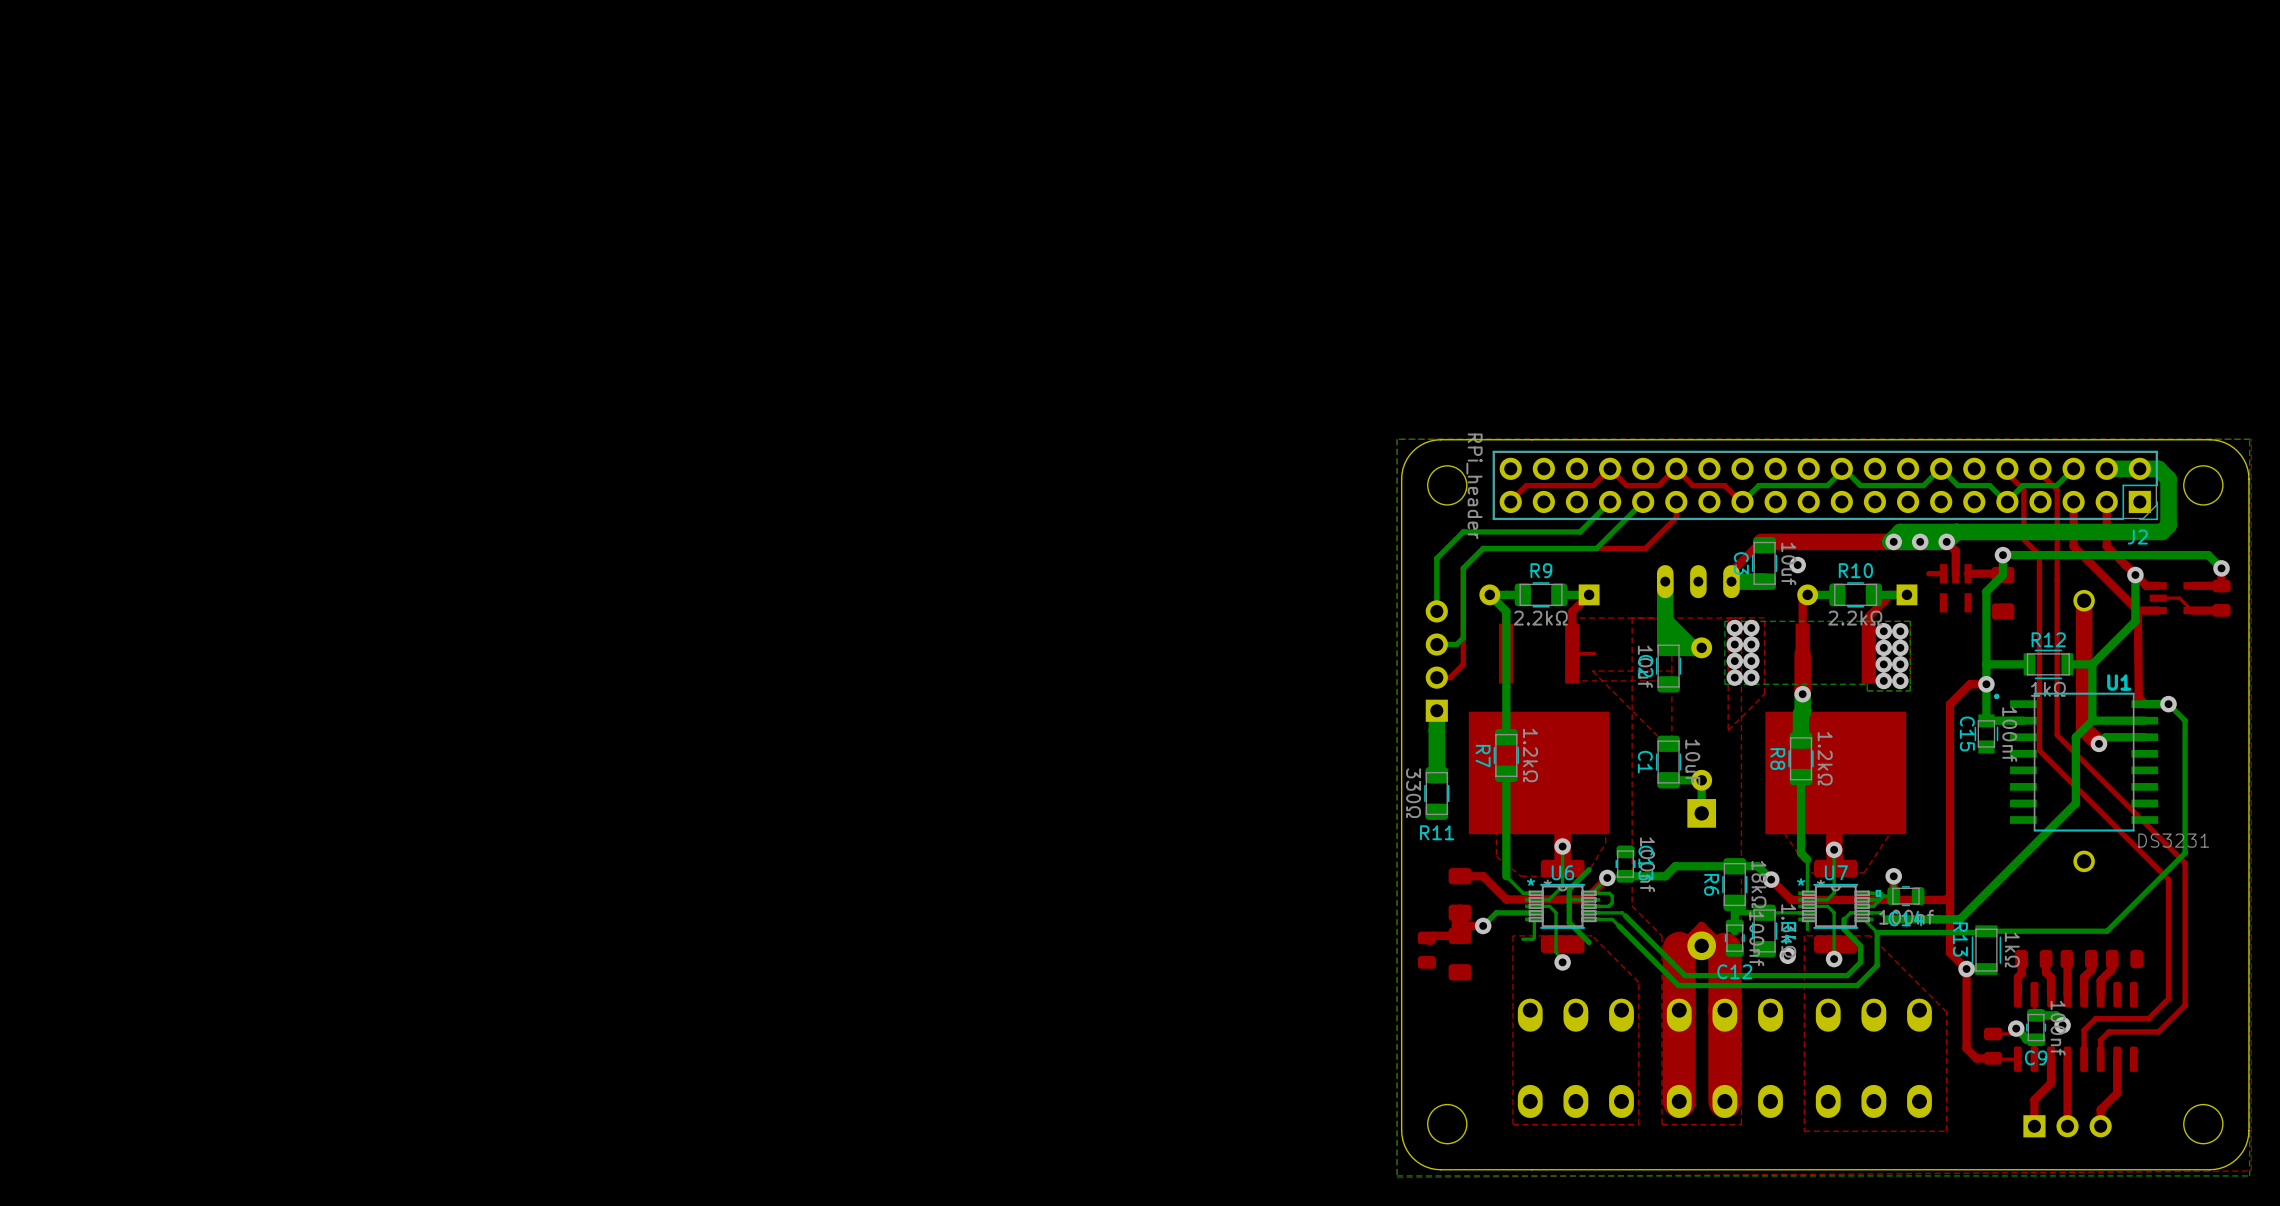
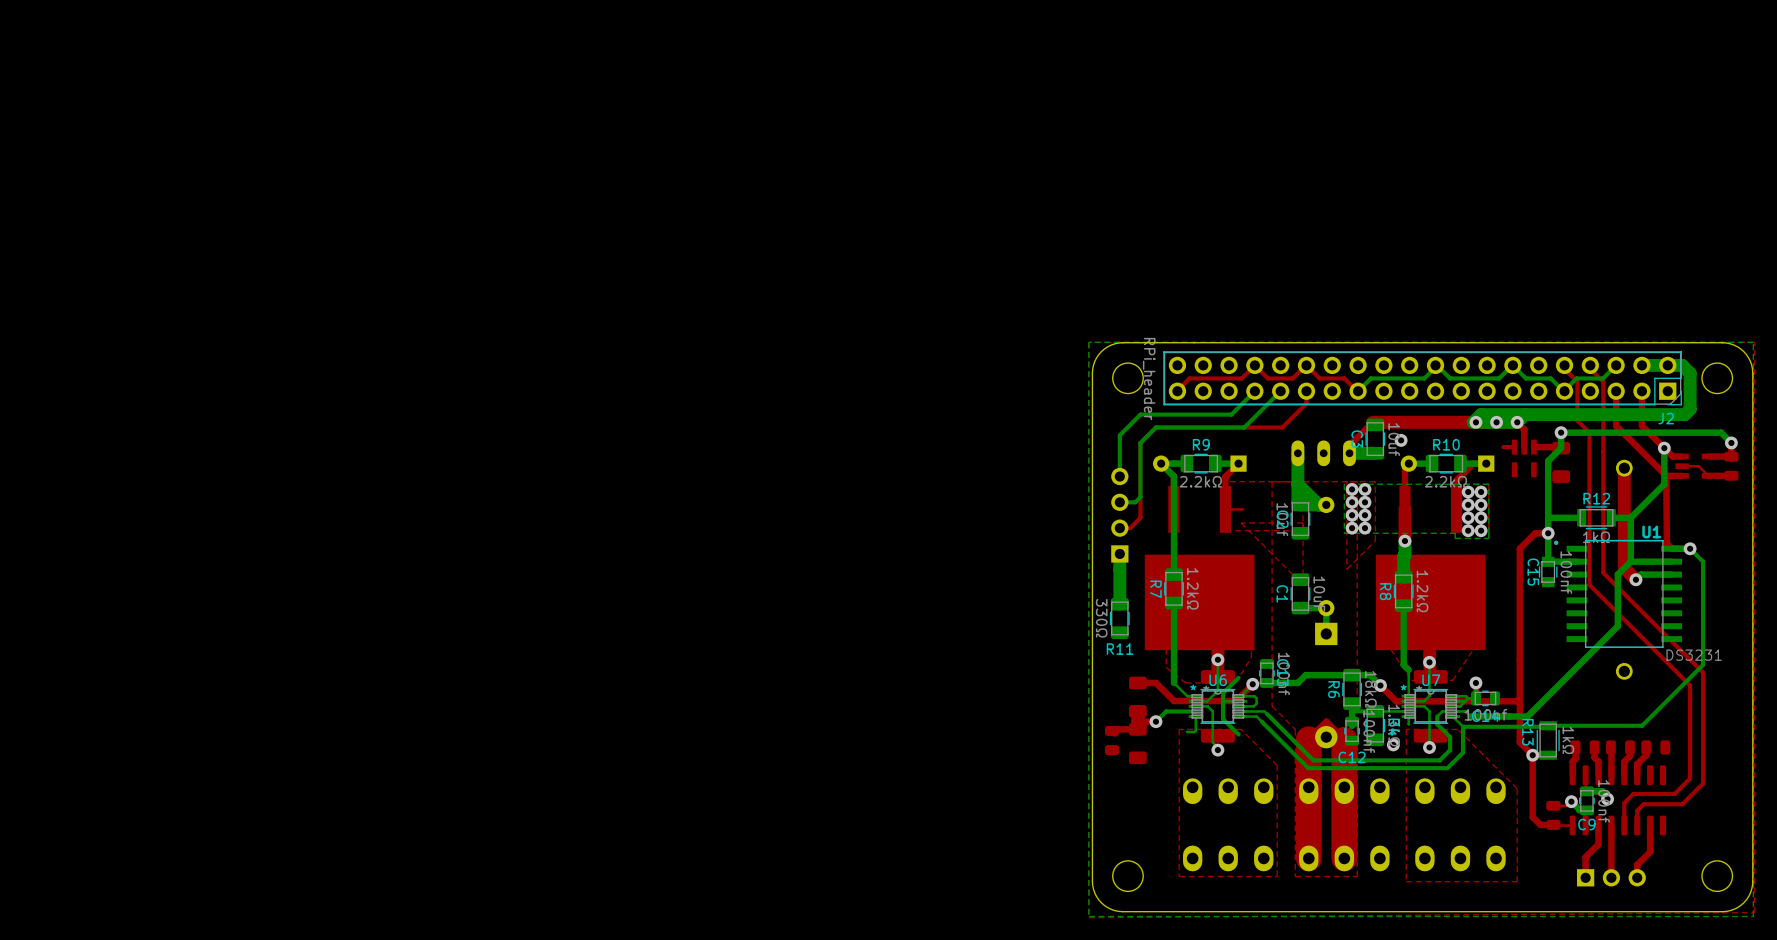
U7 footprint: [1798, 883, 1881, 929] -> [1401, 688, 1461, 724]

